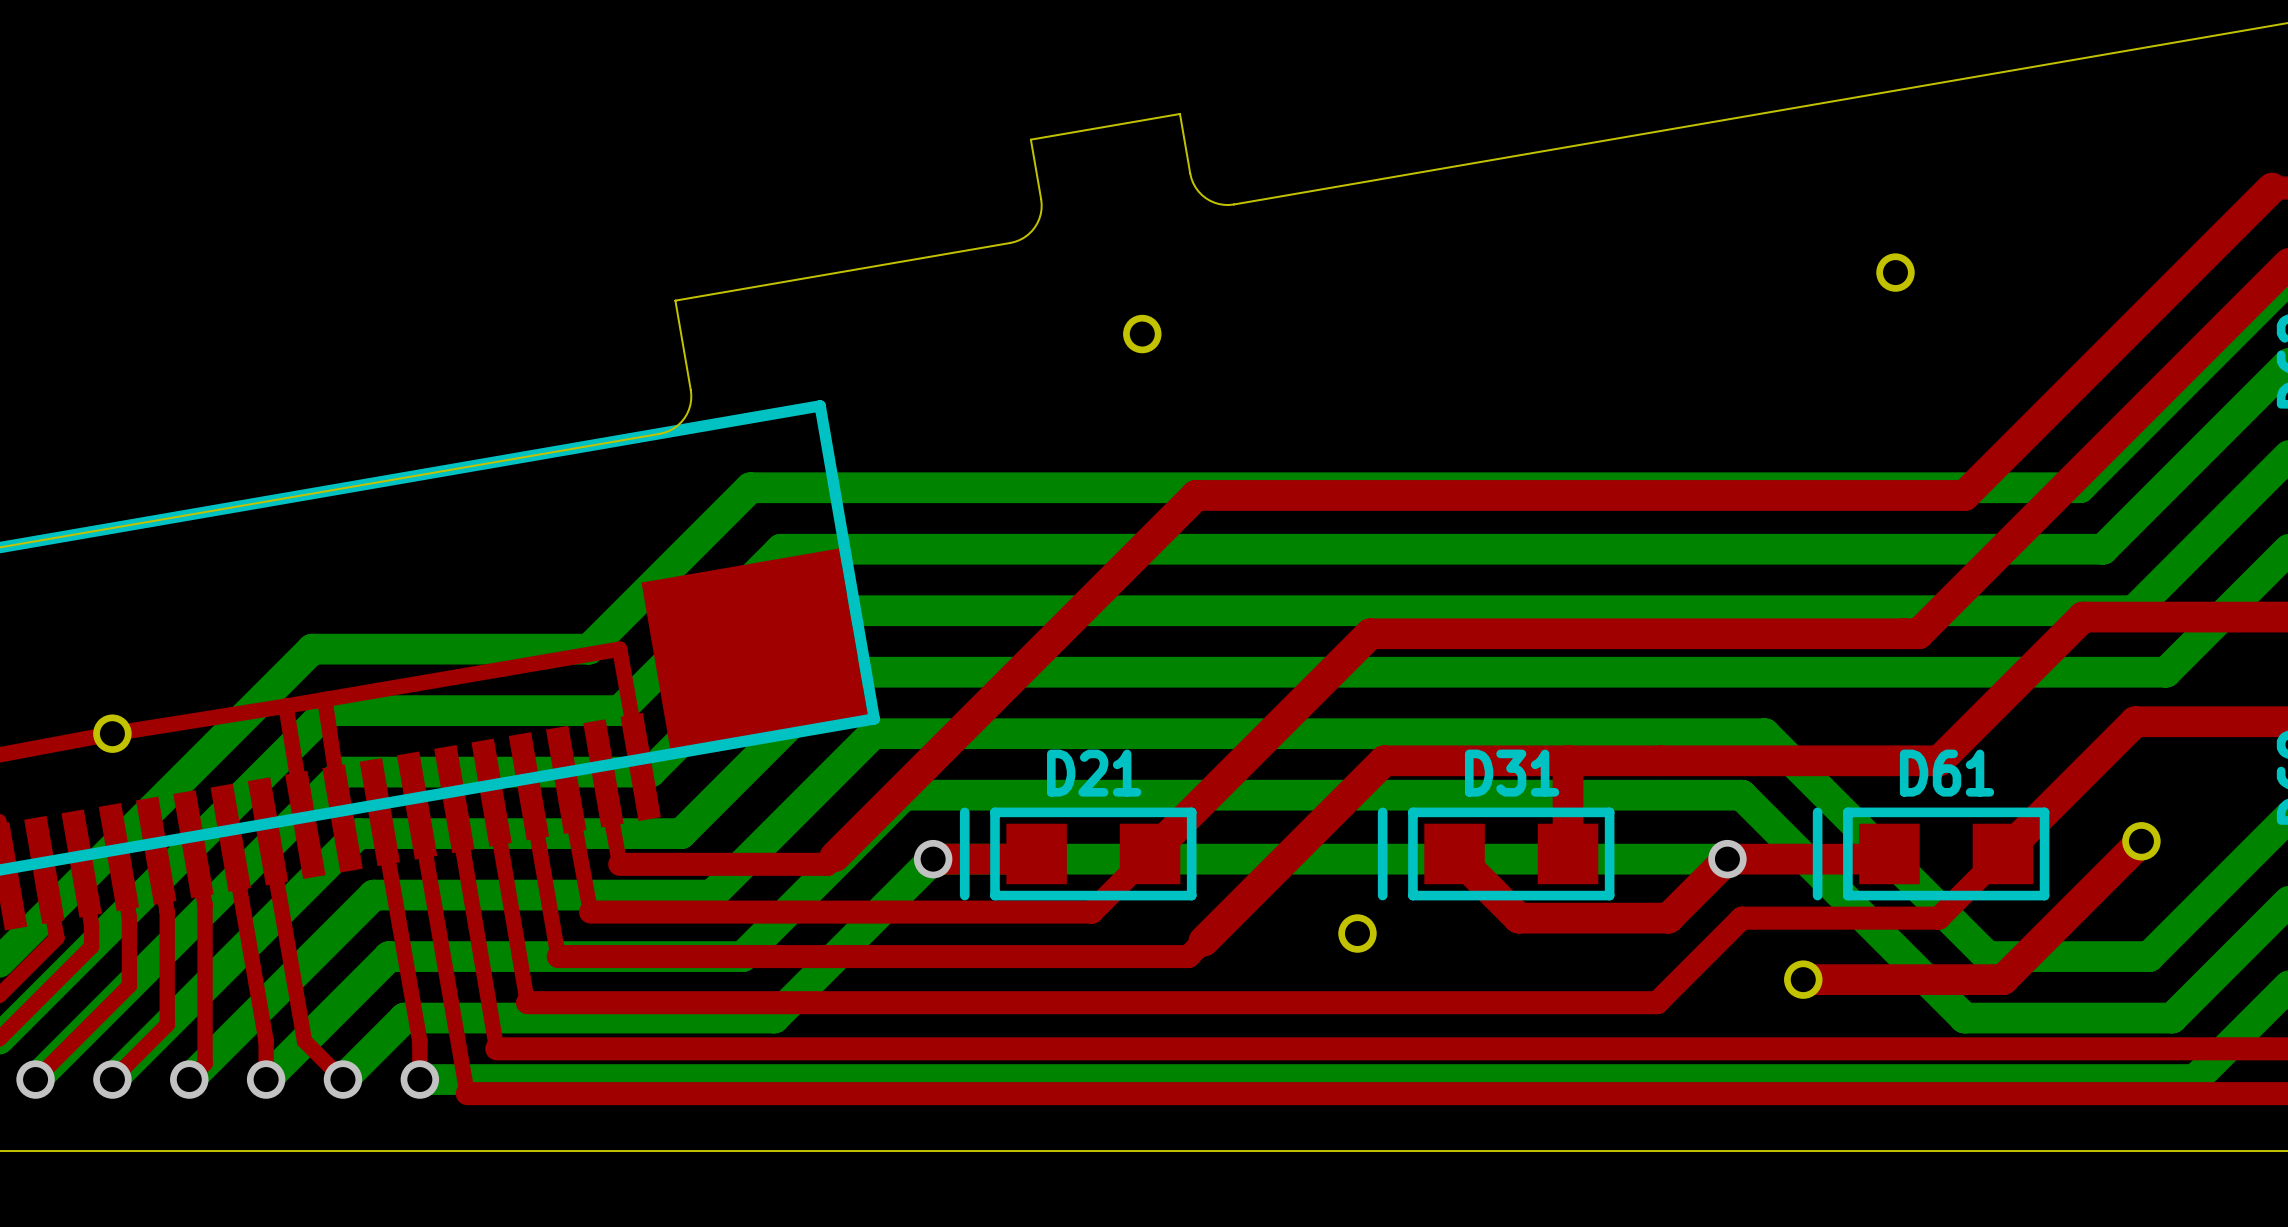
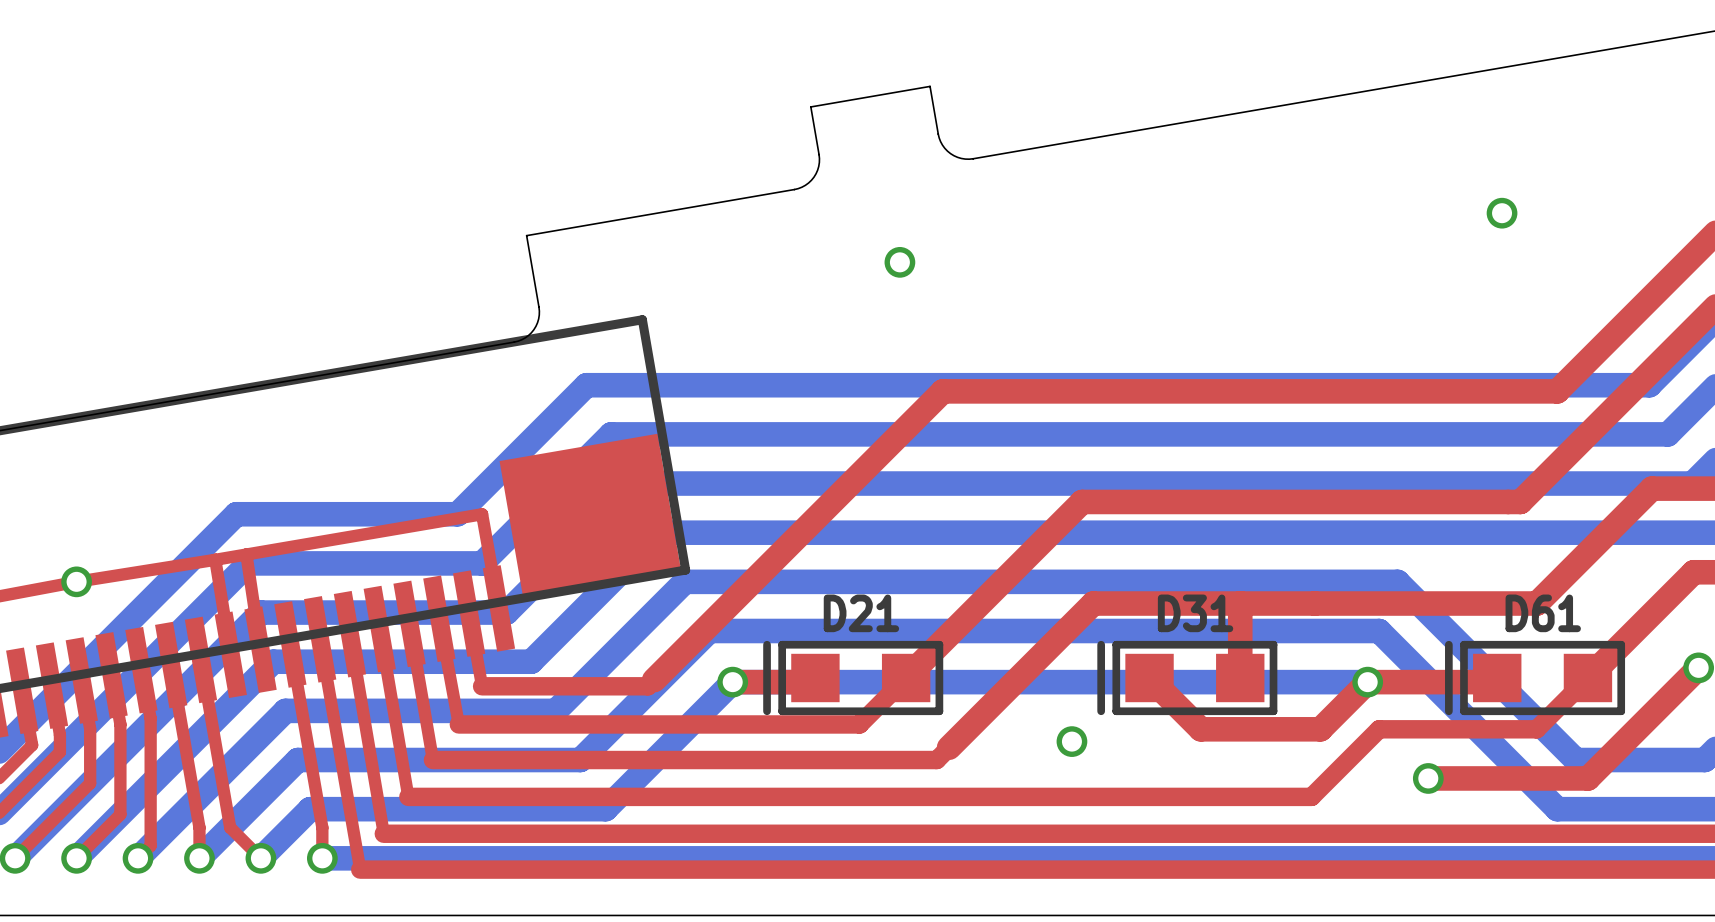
D21 footprint: [959, 807, 1197, 901] -> [763, 640, 944, 716]
D31 footprint: [1377, 807, 1615, 901] -> [1097, 640, 1278, 716]
D61 footprint: [1812, 807, 2050, 901] -> [1445, 640, 1626, 716]

